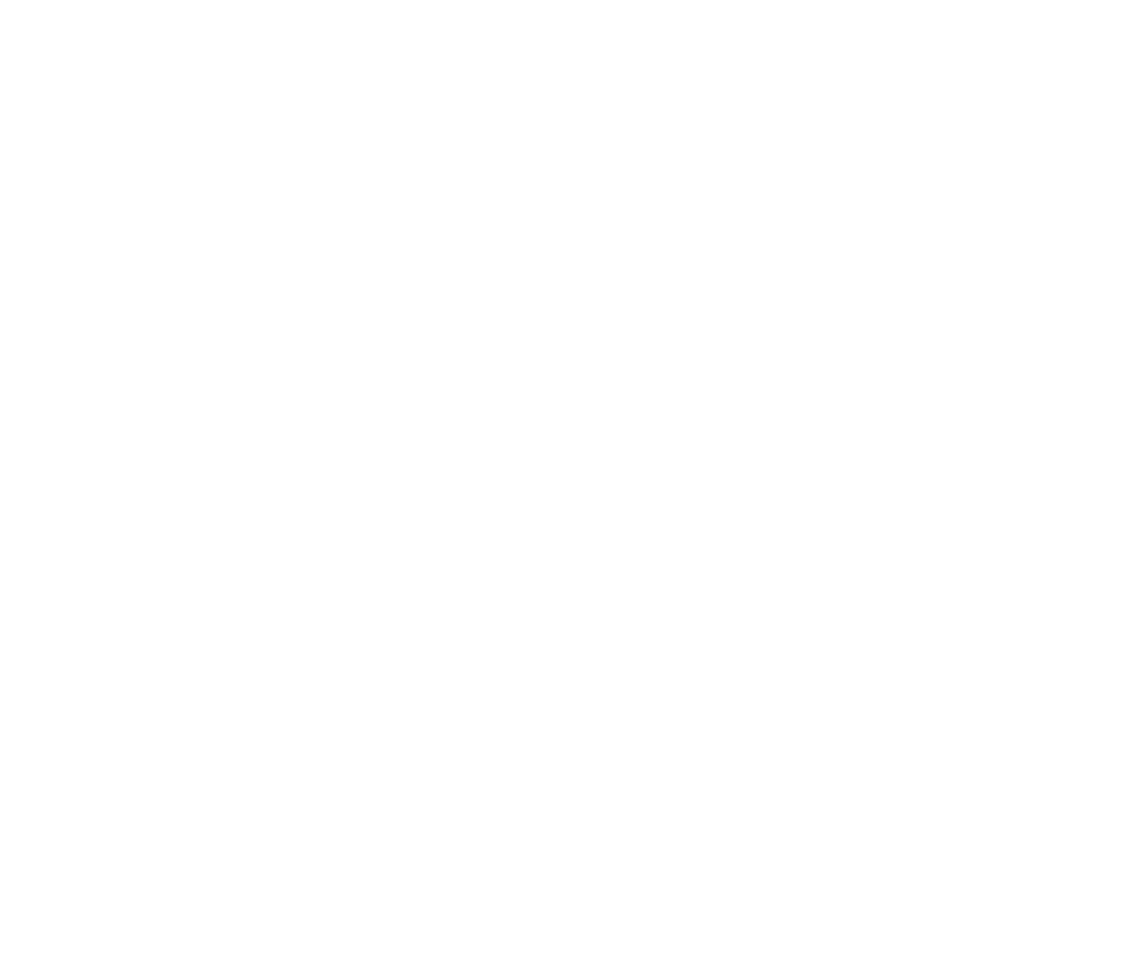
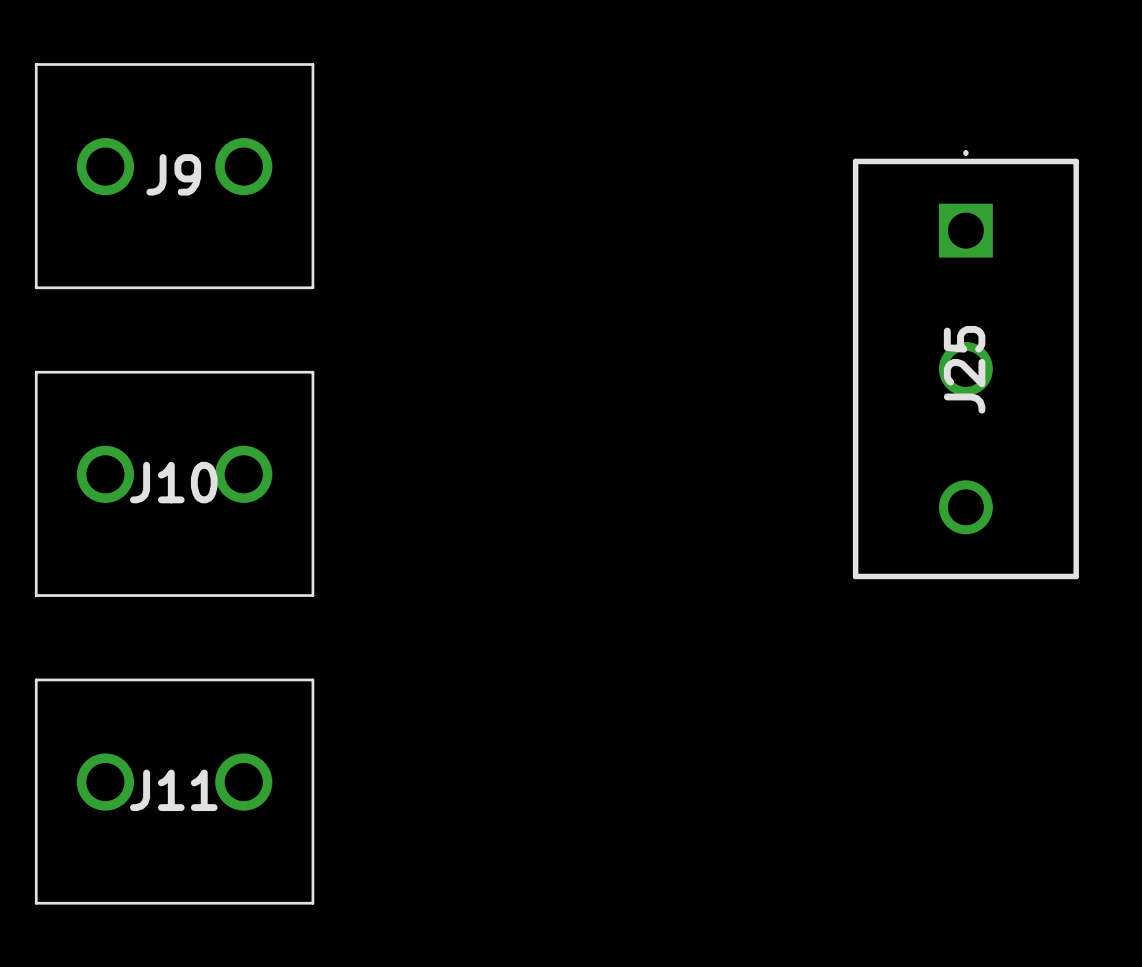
J9: none -> (174, 176)
J25: none -> (965, 364)
J10: none -> (174, 483)
J11: none -> (174, 791)

